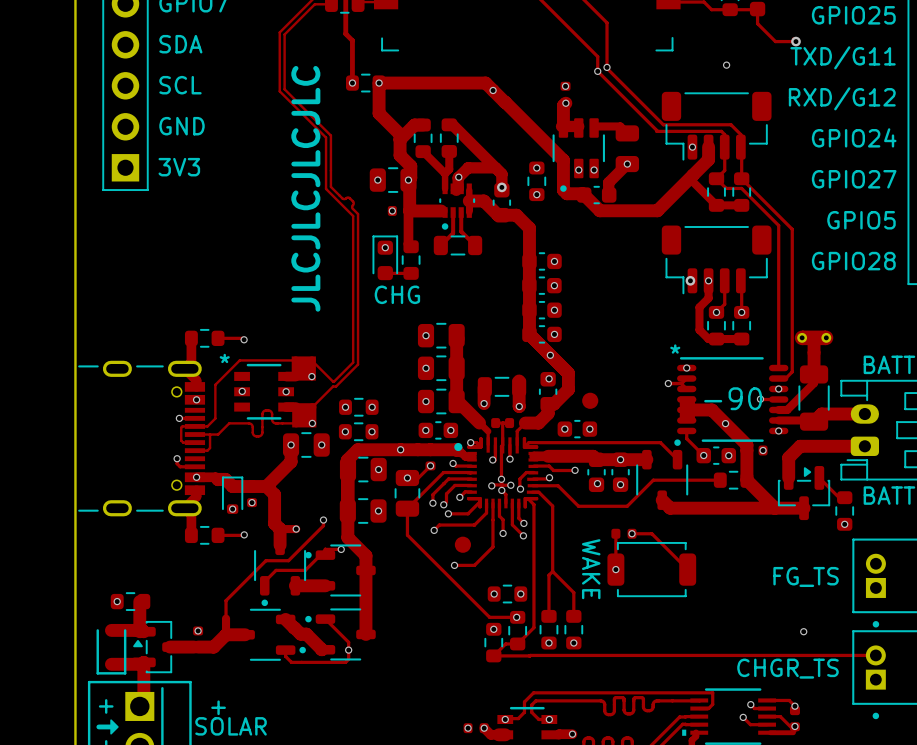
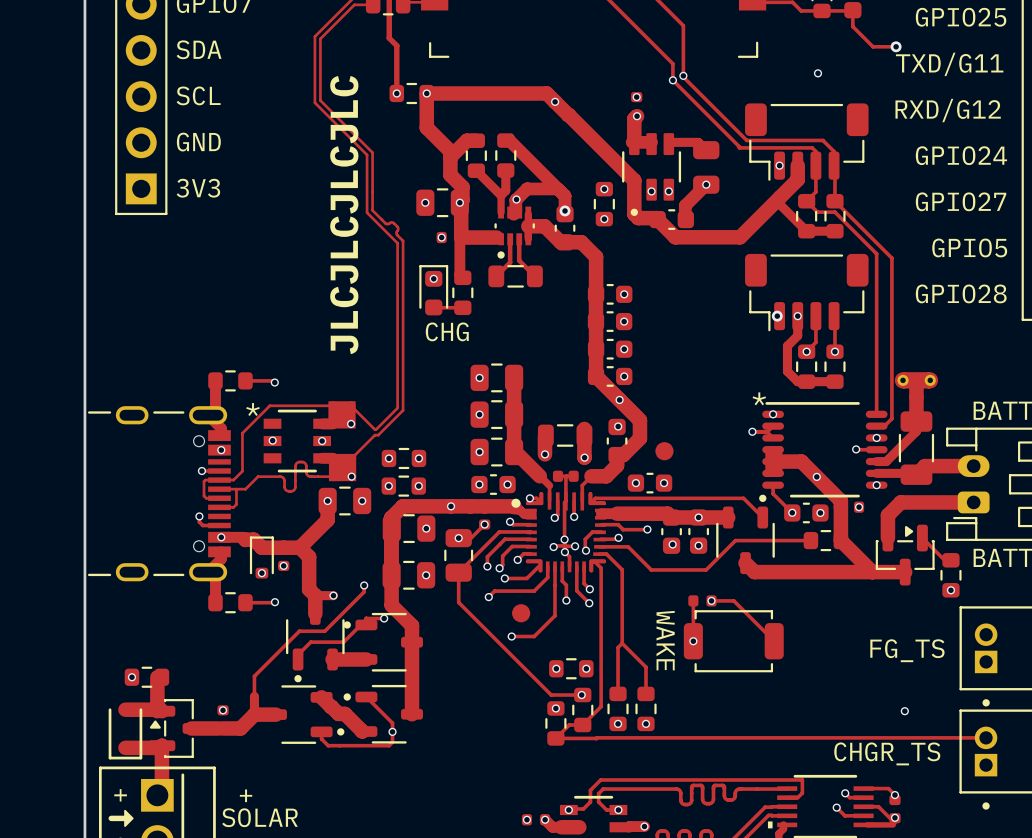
part text: -90 (733, 398) -> none
track: none -> (568, 827) (579, 827)

